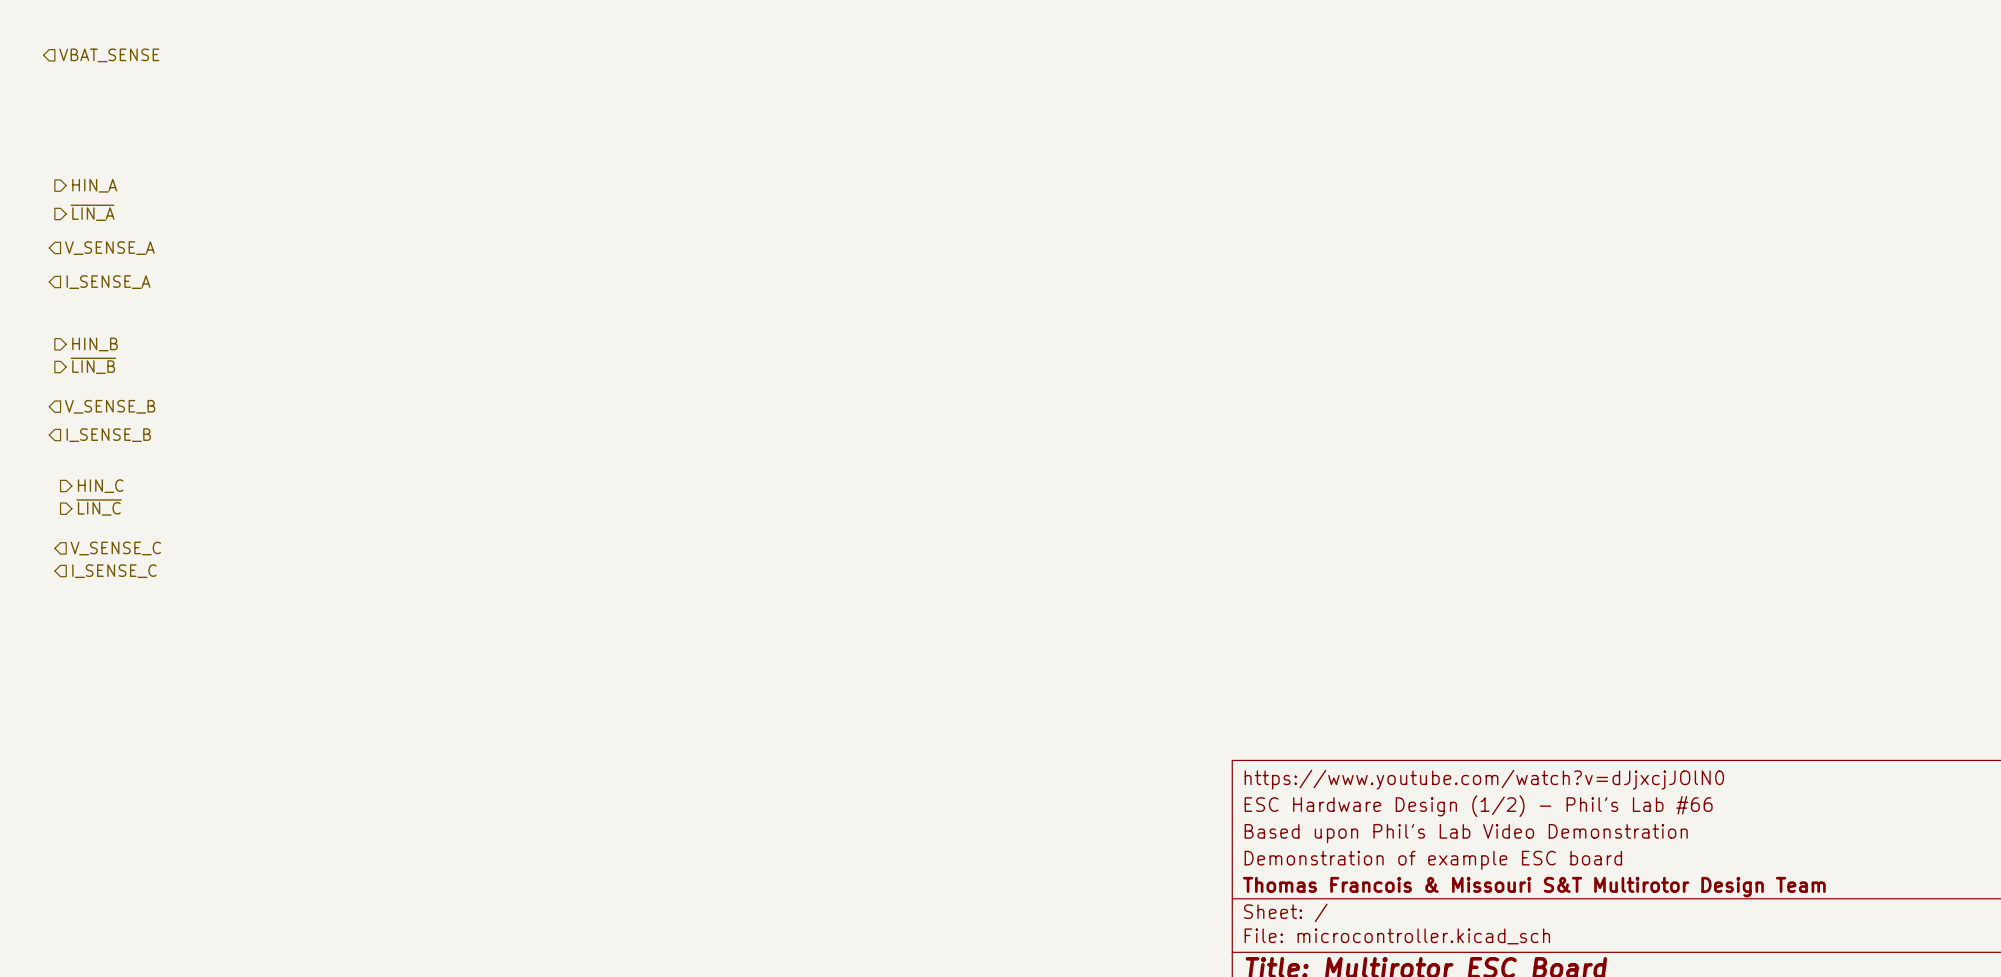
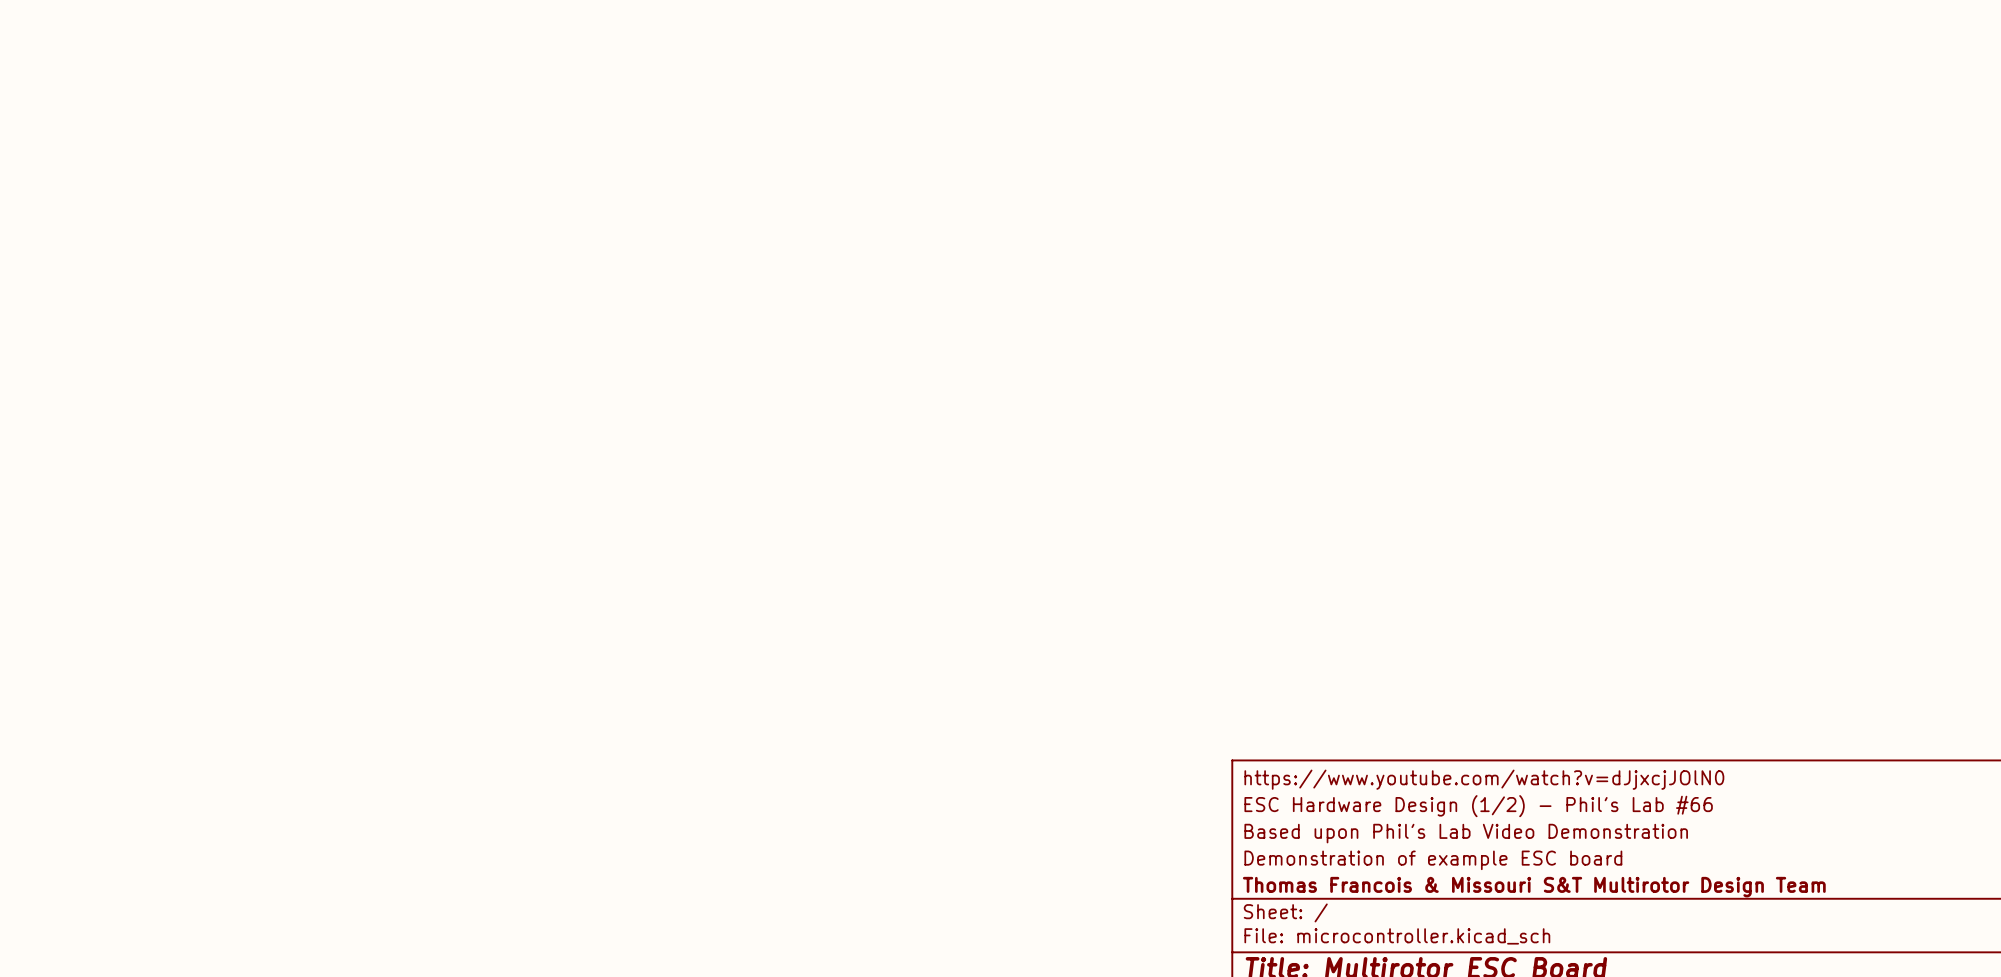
hierarchical label: VBAT_SENSE (109, 55) -> none
hierarchical label: HIN_A (94, 185) -> none
hierarchical label: ~{LIN_A} (92, 212) -> none
hierarchical label: V_SENSE_A (109, 248) -> none
hierarchical label: I_SENSE_A (108, 282) -> none
hierarchical label: HIN_B (95, 344) -> none
hierarchical label: ~{LIN_B} (93, 365) -> none
hierarchical label: V_SENSE_B (110, 406) -> none
hierarchical label: I_SENSE_B (108, 435) -> none
hierarchical label: HIN_C (100, 486) -> none
hierarchical label: ~{LIN_C} (99, 507) -> none
hierarchical label: V_SENSE_C (115, 548) -> none
hierarchical label: I_SENSE_C (114, 571) -> none

